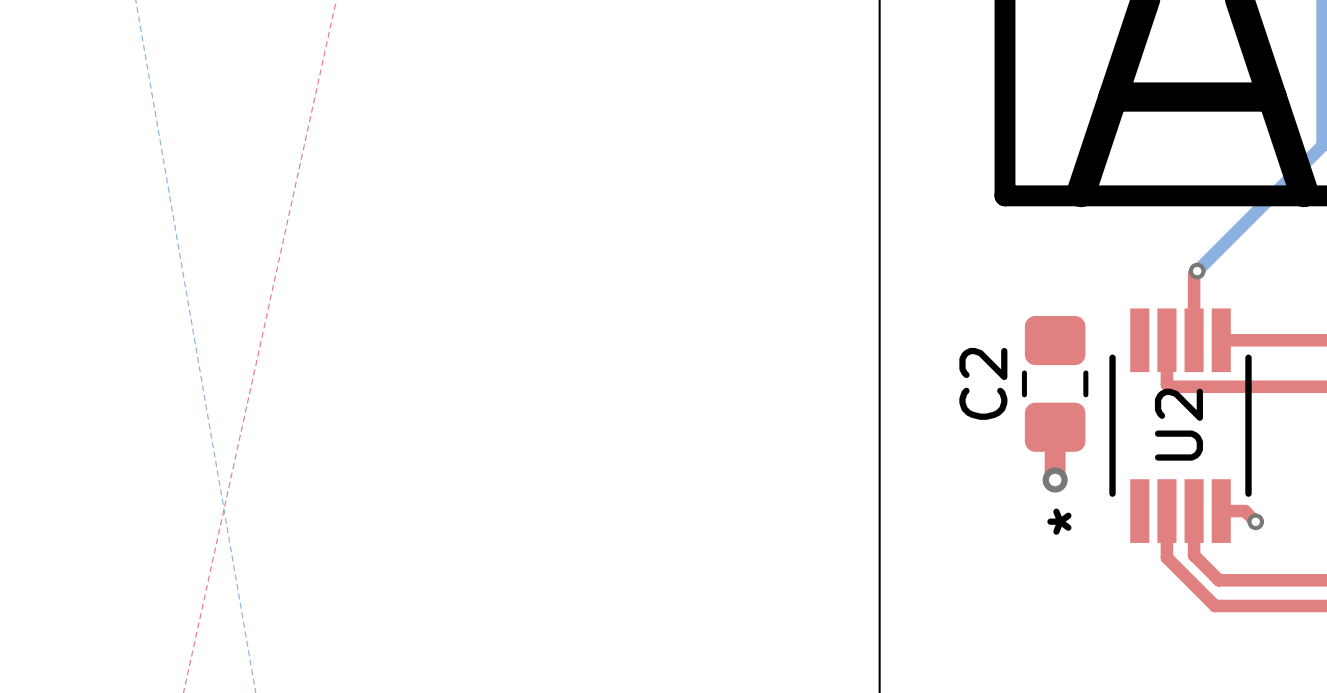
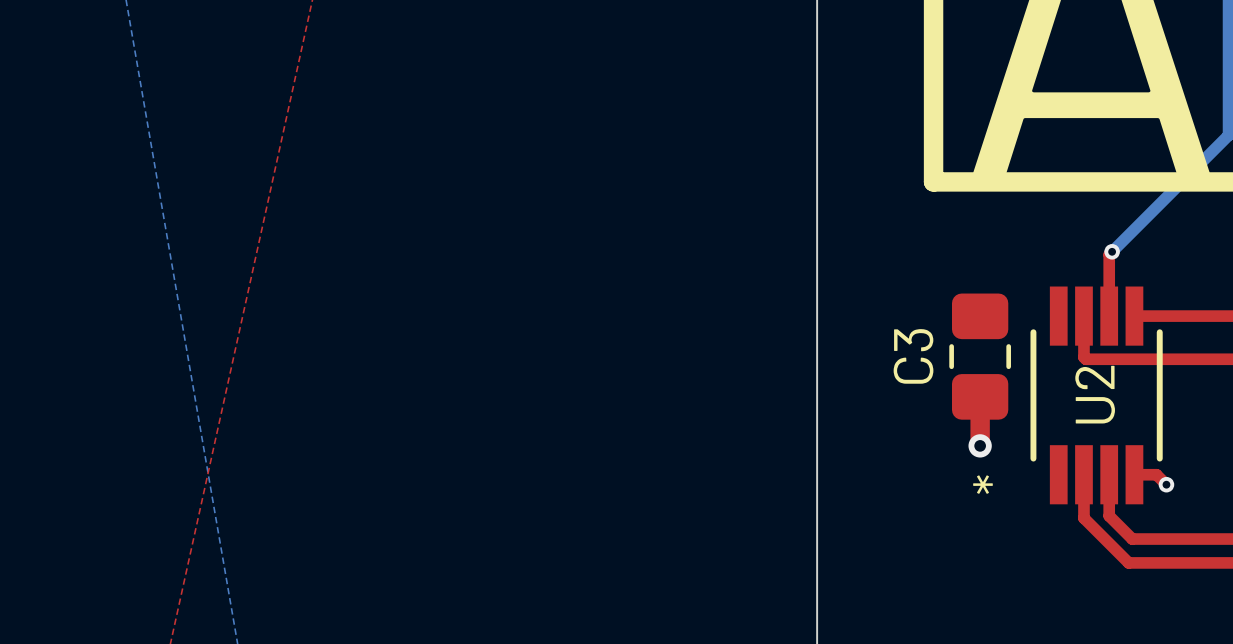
C2 name: C2 (983, 383) -> C3 (913, 356)

